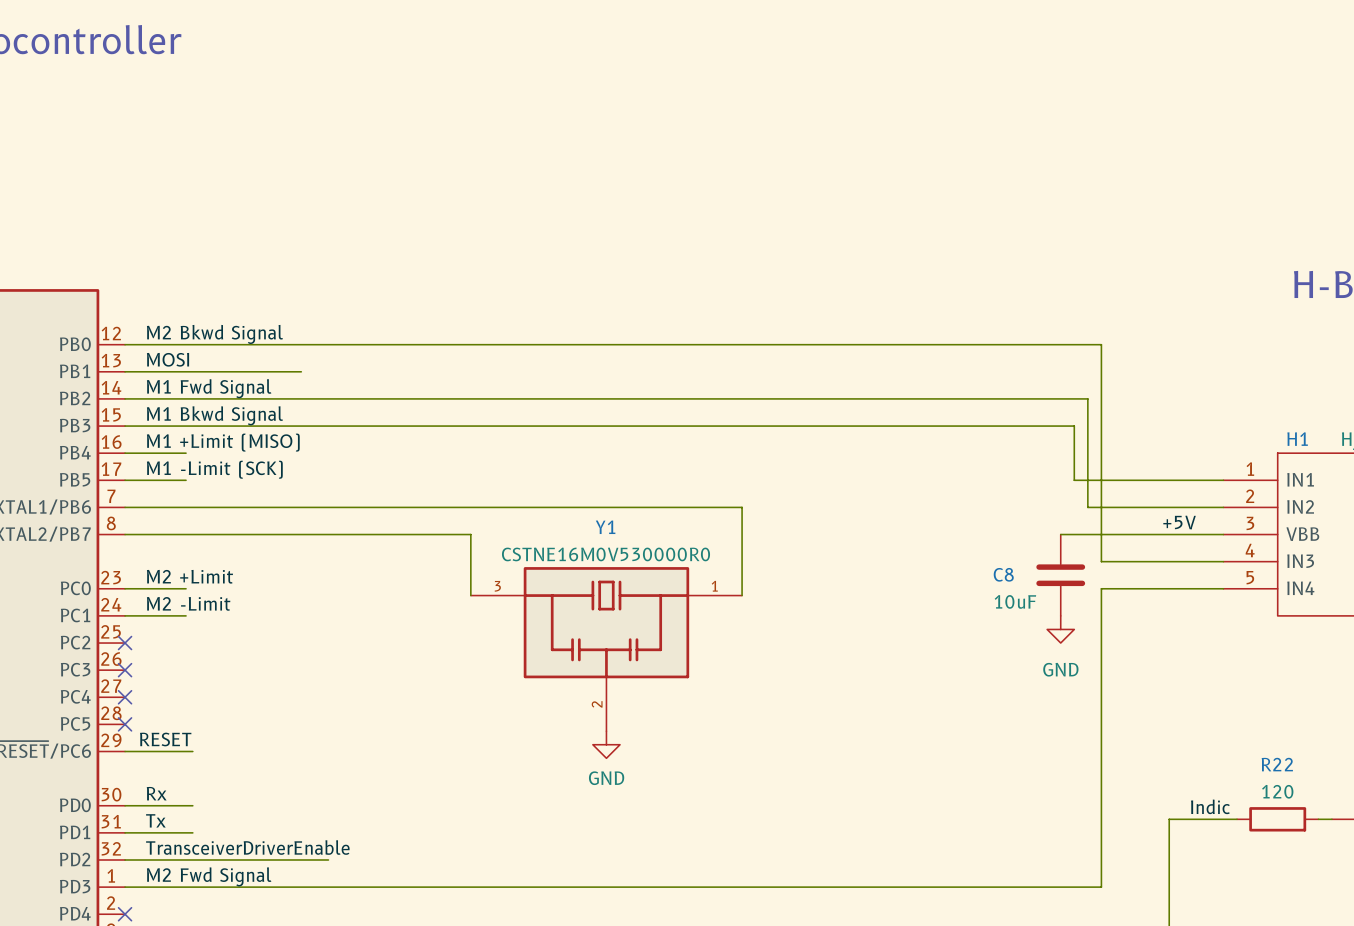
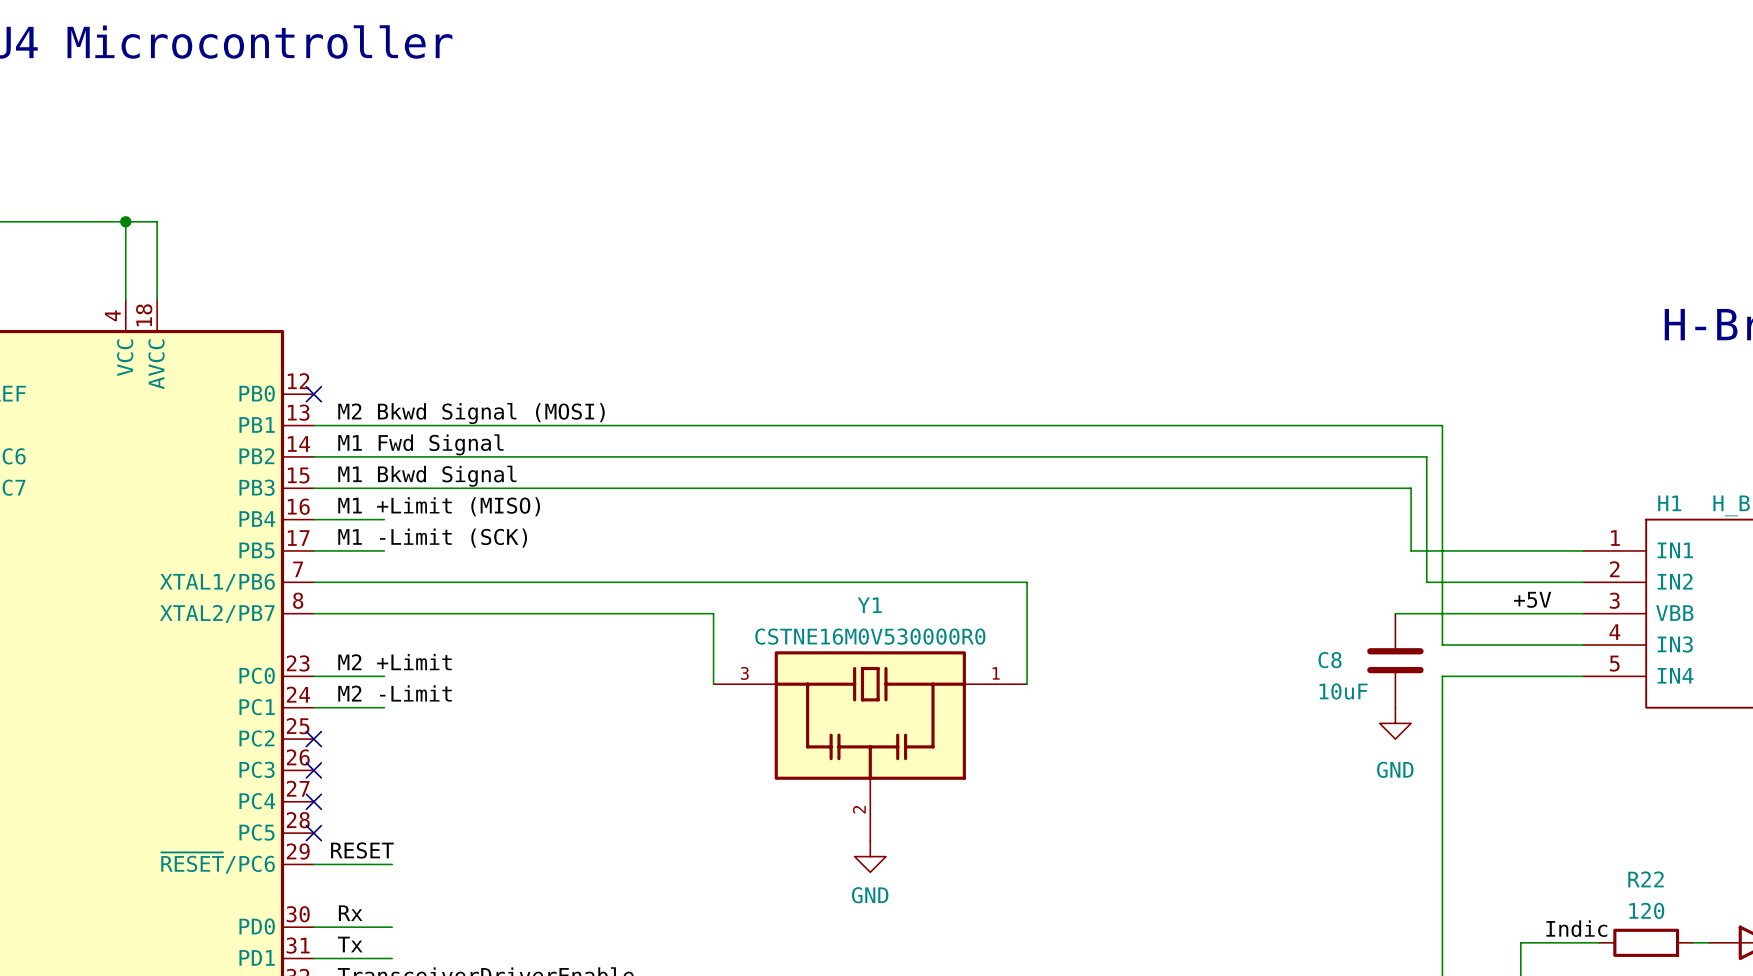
label: M2 Bkwd Signal (214, 334) -> none
wire: (125, 344) (1101, 344) (1101, 371) -> (517, 425) (1442, 425)
no-connect mark: none -> (313, 394)
label: MOSI (168, 359) -> M2 Bkwd Signal (MOSI) (471, 413)

